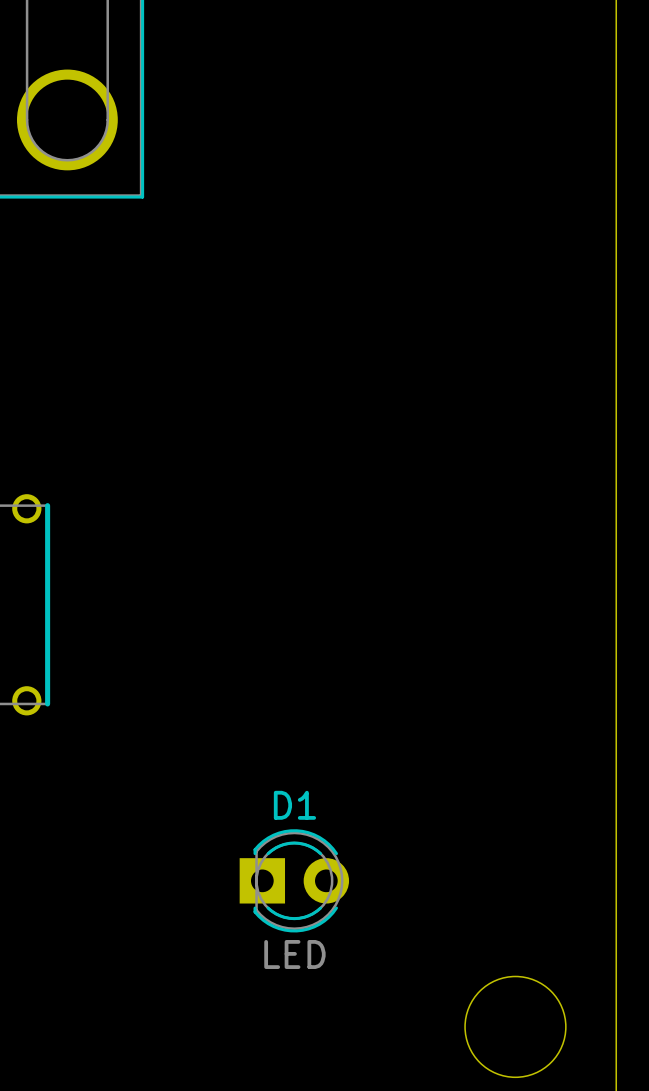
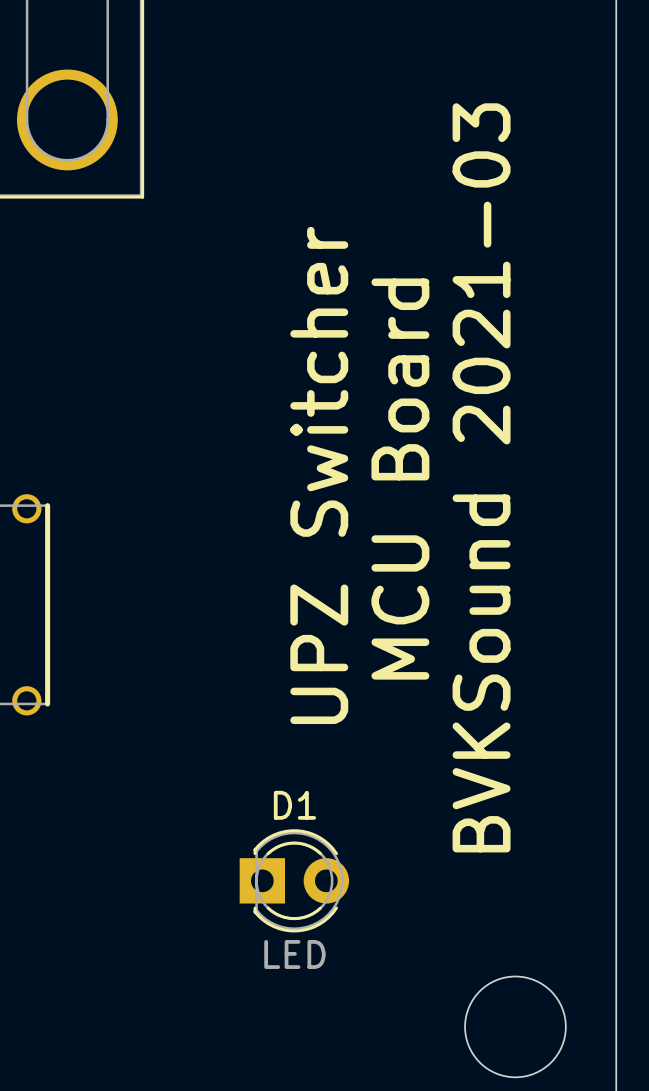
text: none -> UPZ Switcher (319, 475)
text: none -> BVKSound 2021-03 (481, 477)
text: none -> MCU Board (400, 479)

